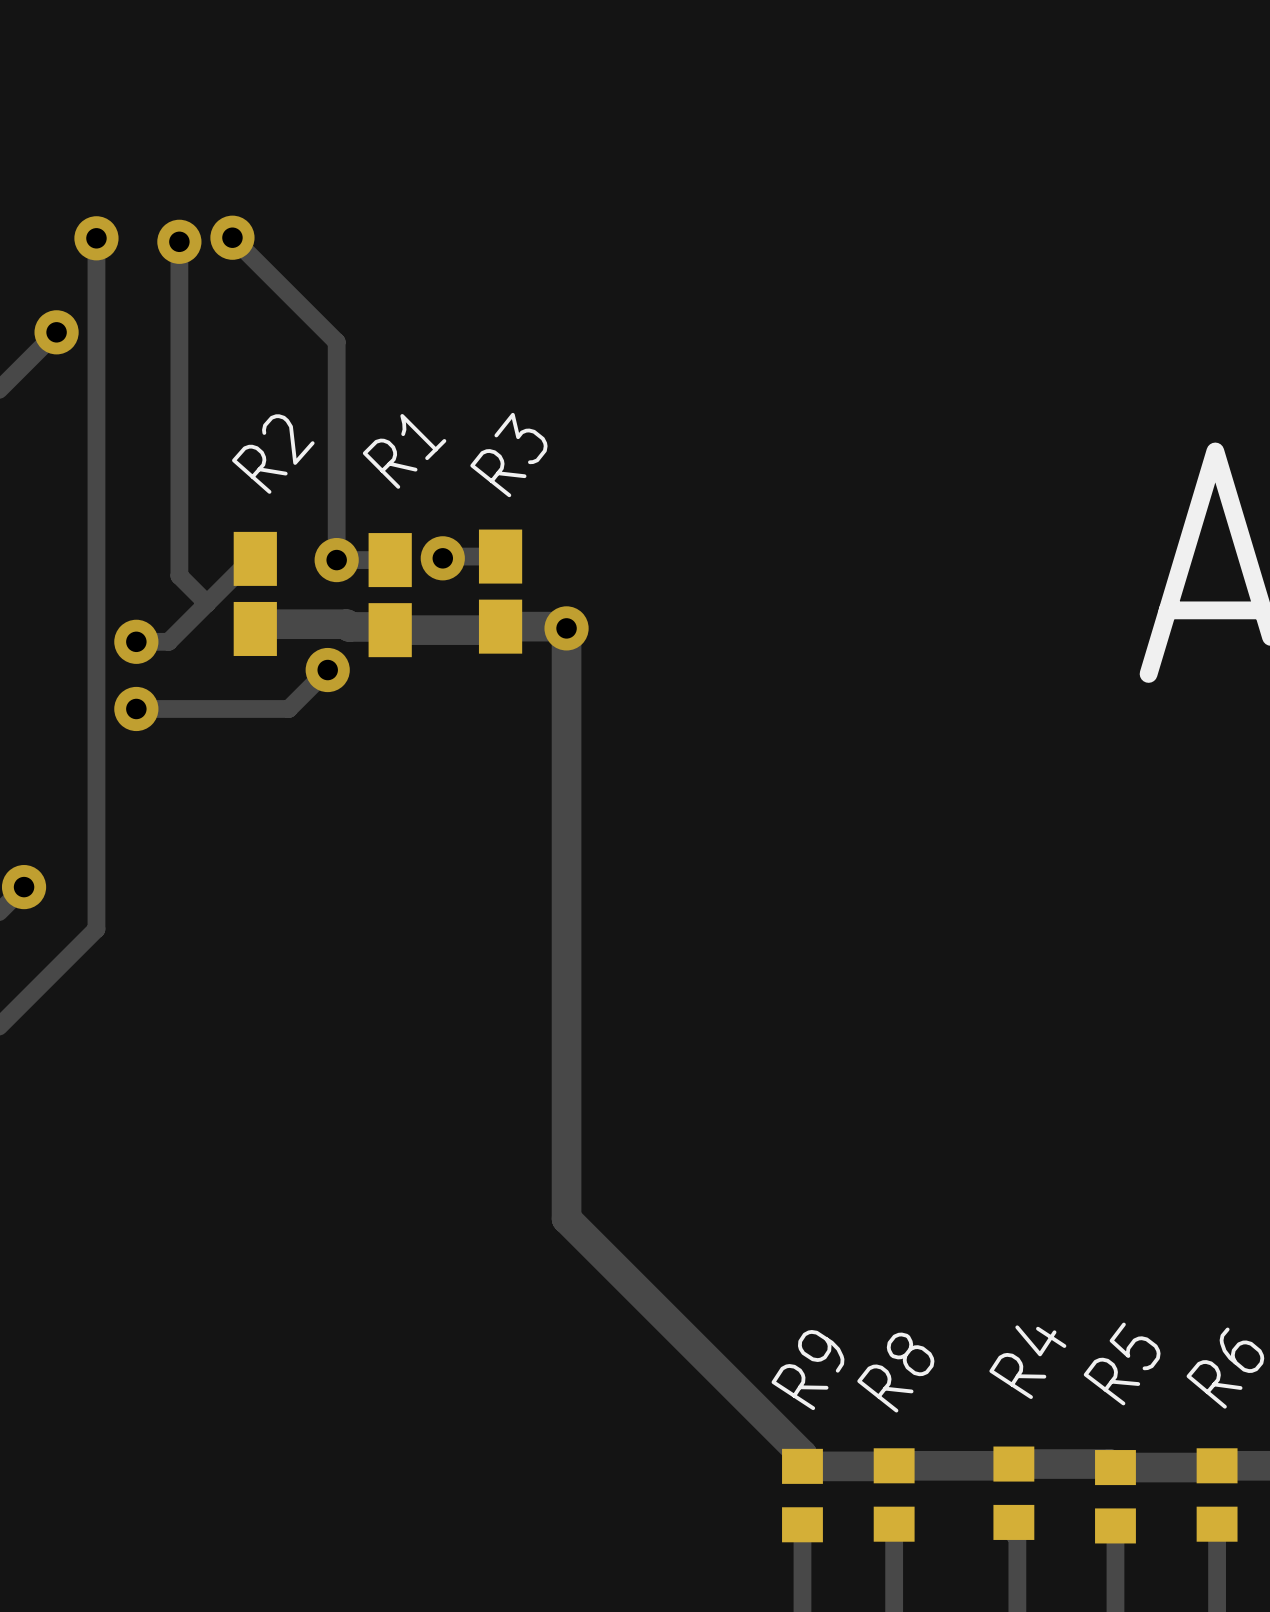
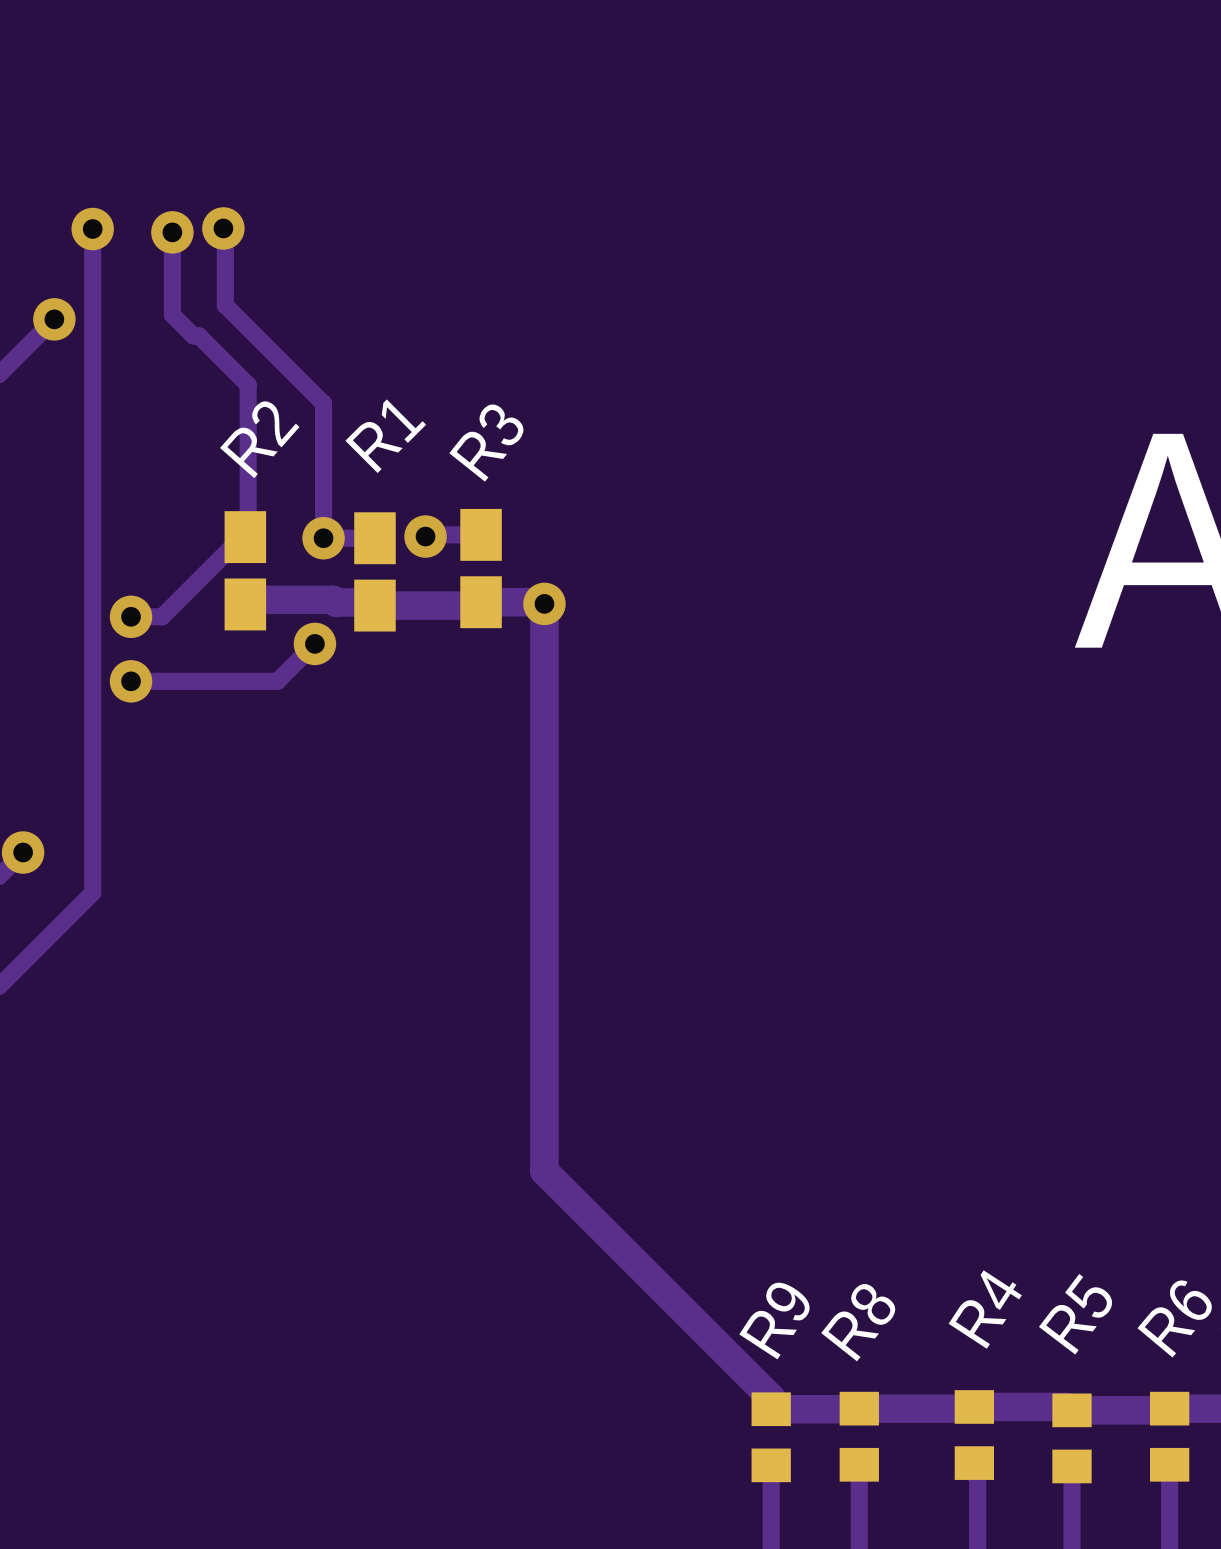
track: (232, 237) (336, 341) (336, 419) -> (223, 228) (225, 230) (225, 305) (323, 403)
track: (179, 327) (179, 575) (207, 603) -> (172, 314) (193, 335) (199, 335) (248, 385) (248, 534) (245, 537)

